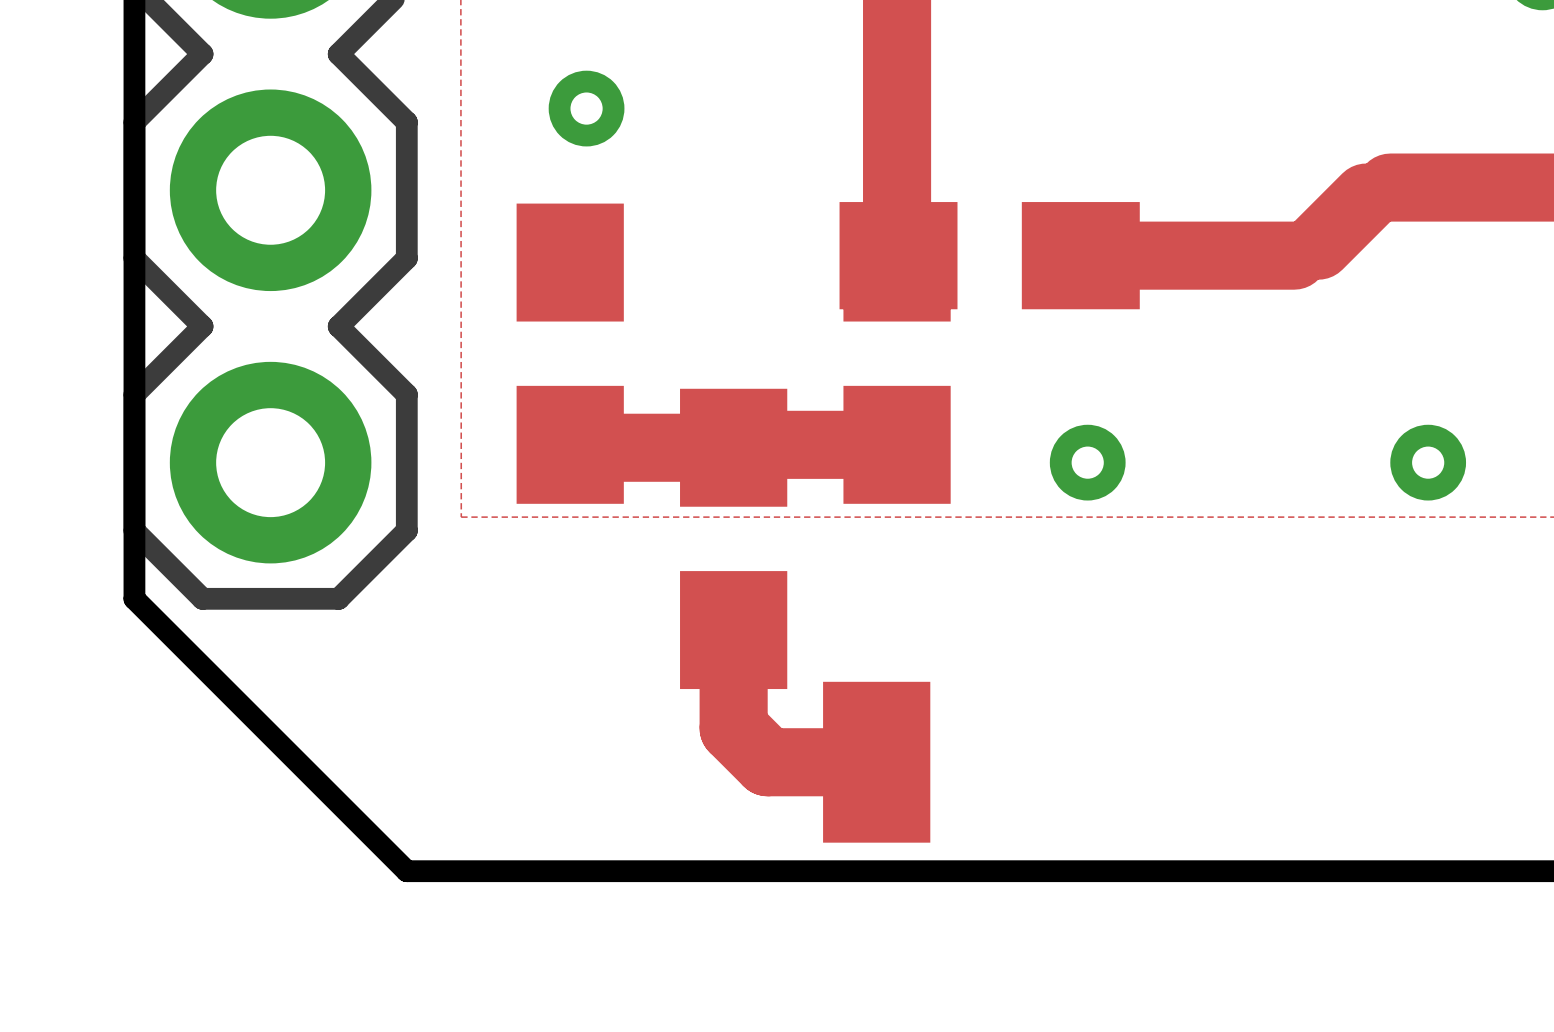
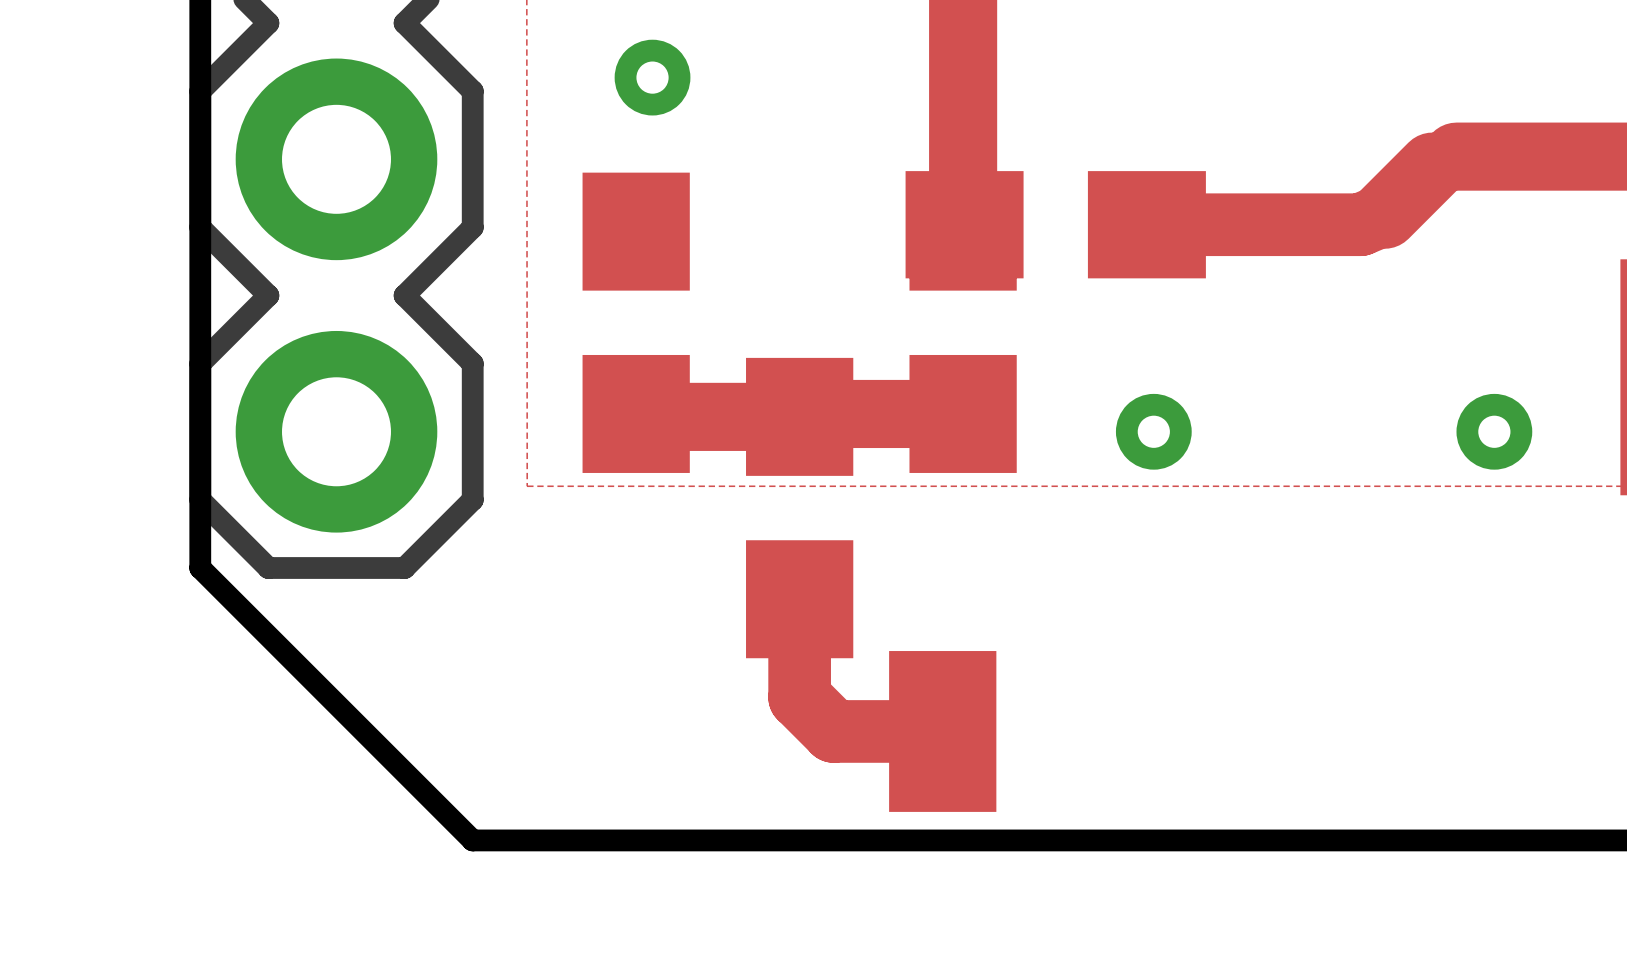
top track width: thick (1294, 255) (1080, 255) -> thin (1360, 224) (1146, 224)
top track width: thick (733, 630) (733, 728) (767, 762) (876, 762) -> thin (799, 599) (799, 697) (833, 731) (942, 731)

